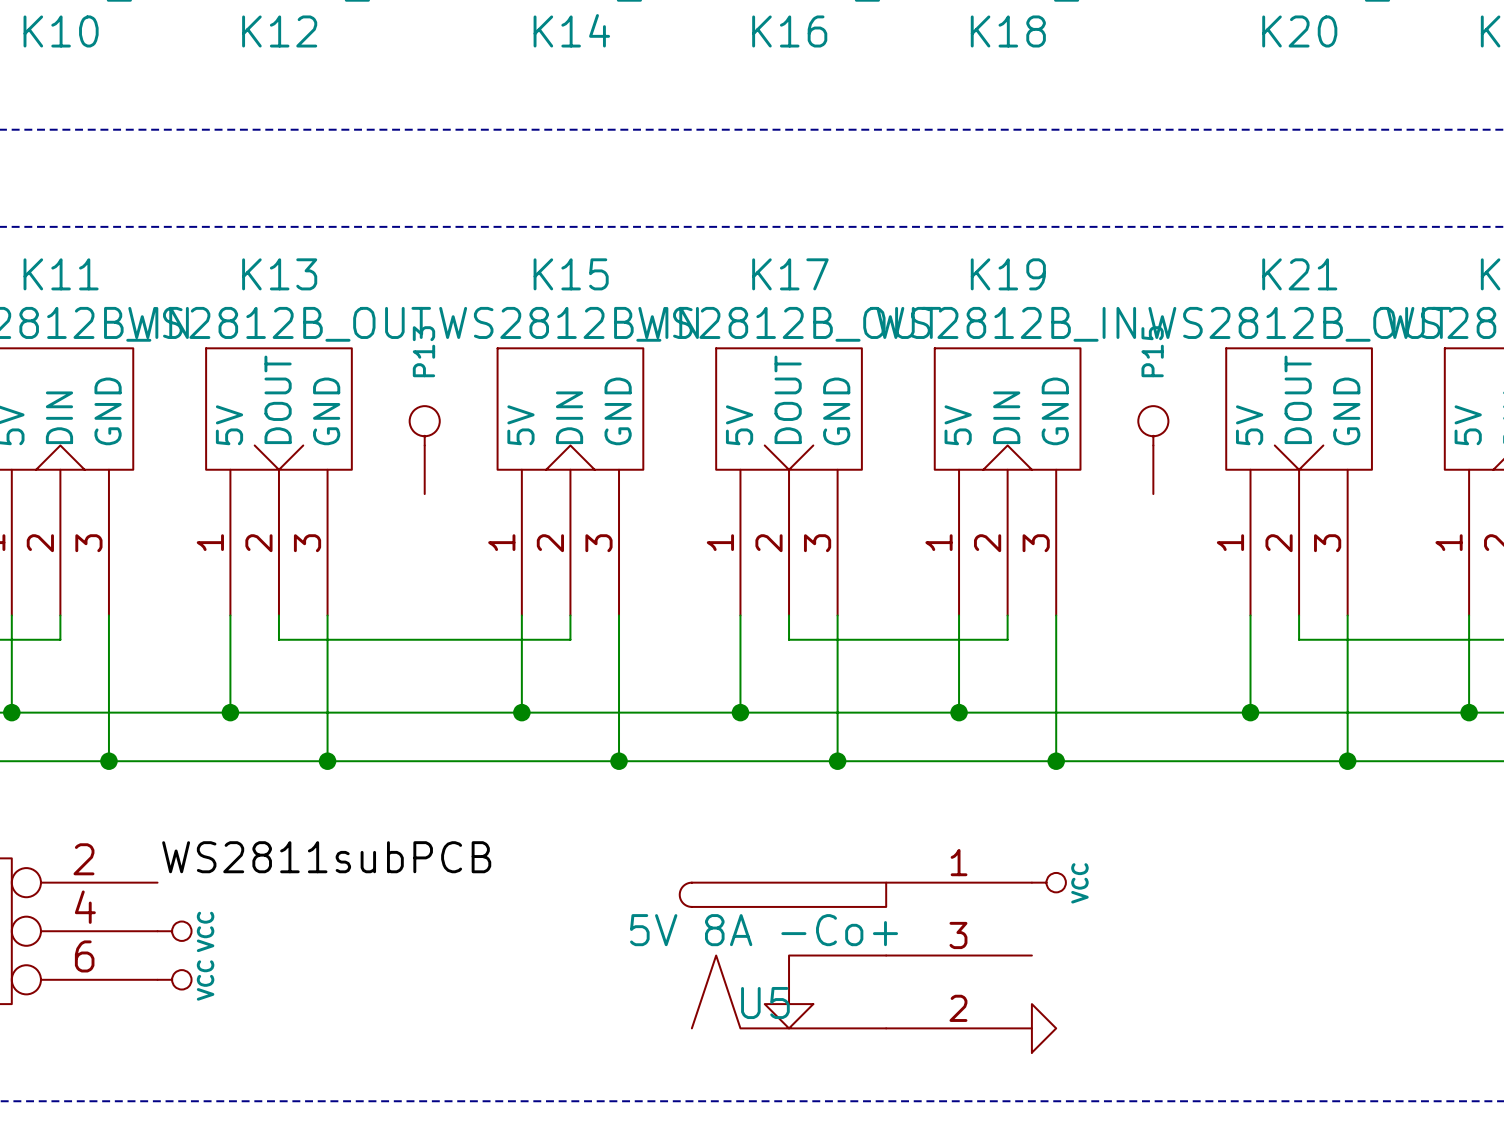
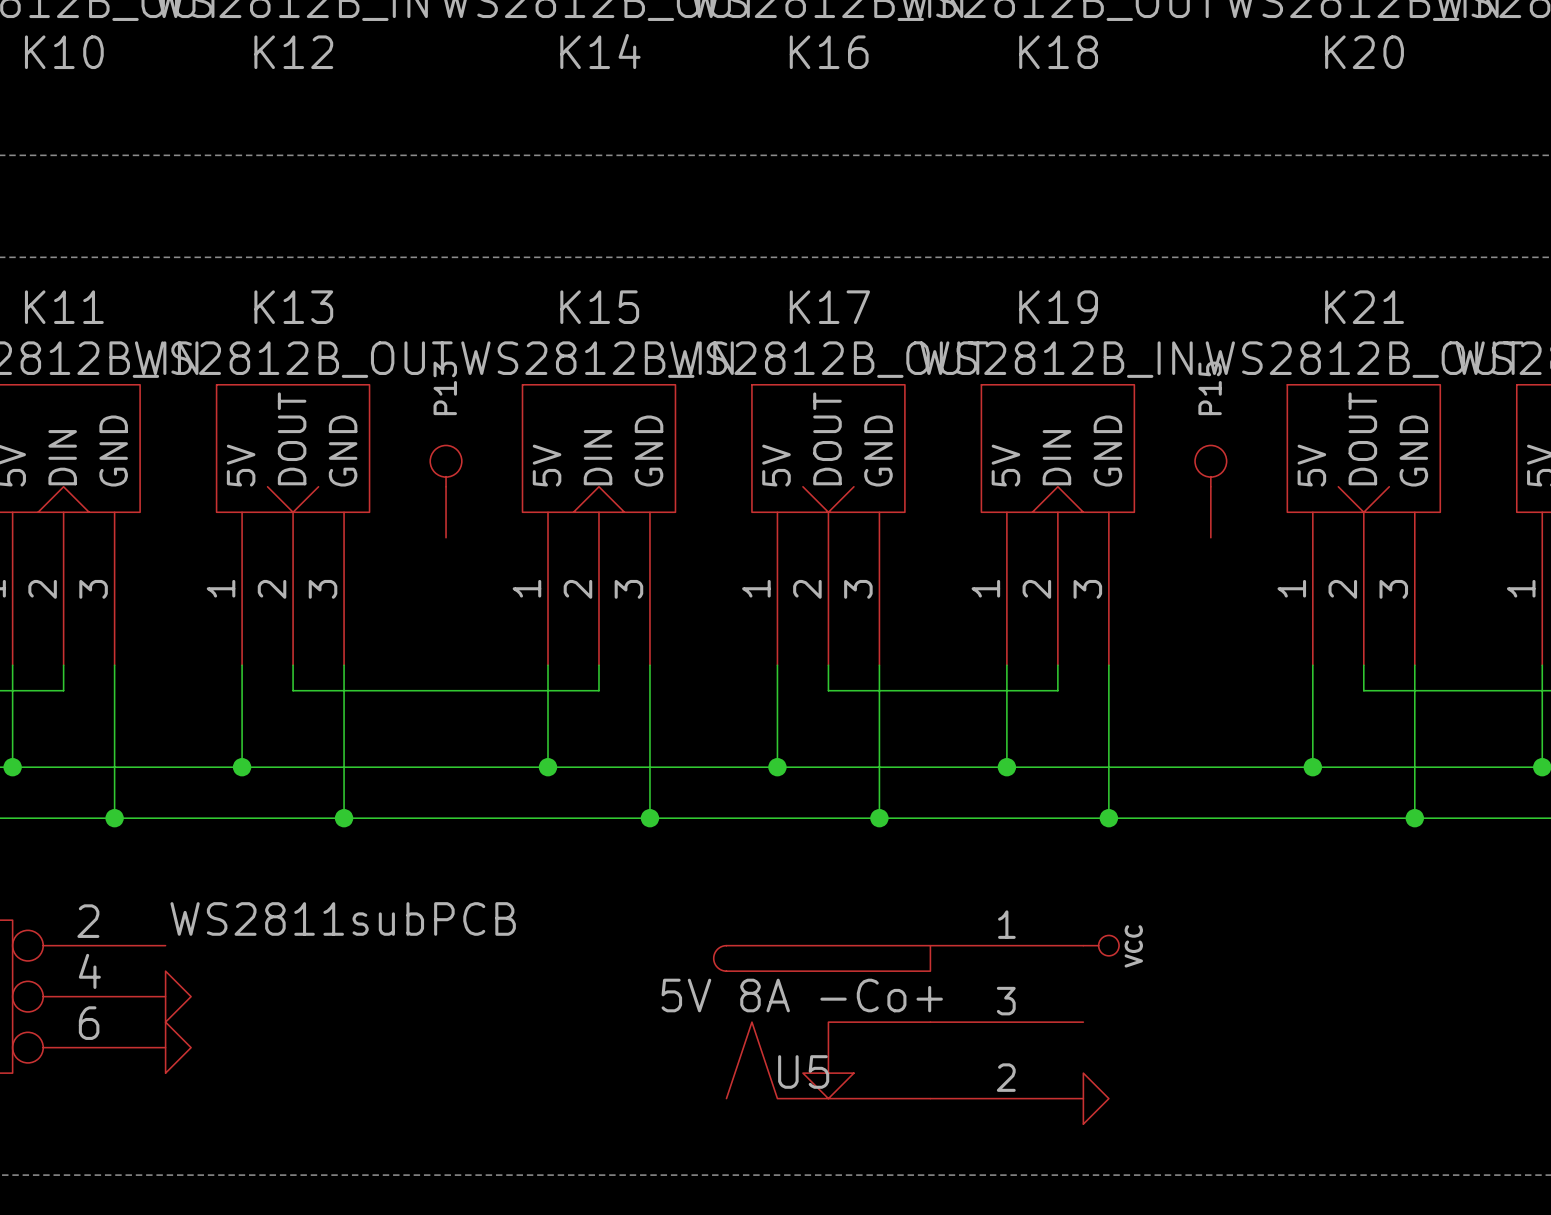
power symbol shape: [157, 921, 192, 941] -> [165, 971, 192, 1023]
power symbol text: VCC (205, 931) -> none
power symbol shape: [157, 970, 192, 990] -> [165, 1022, 192, 1074]
power symbol text: VCC (205, 980) -> none

